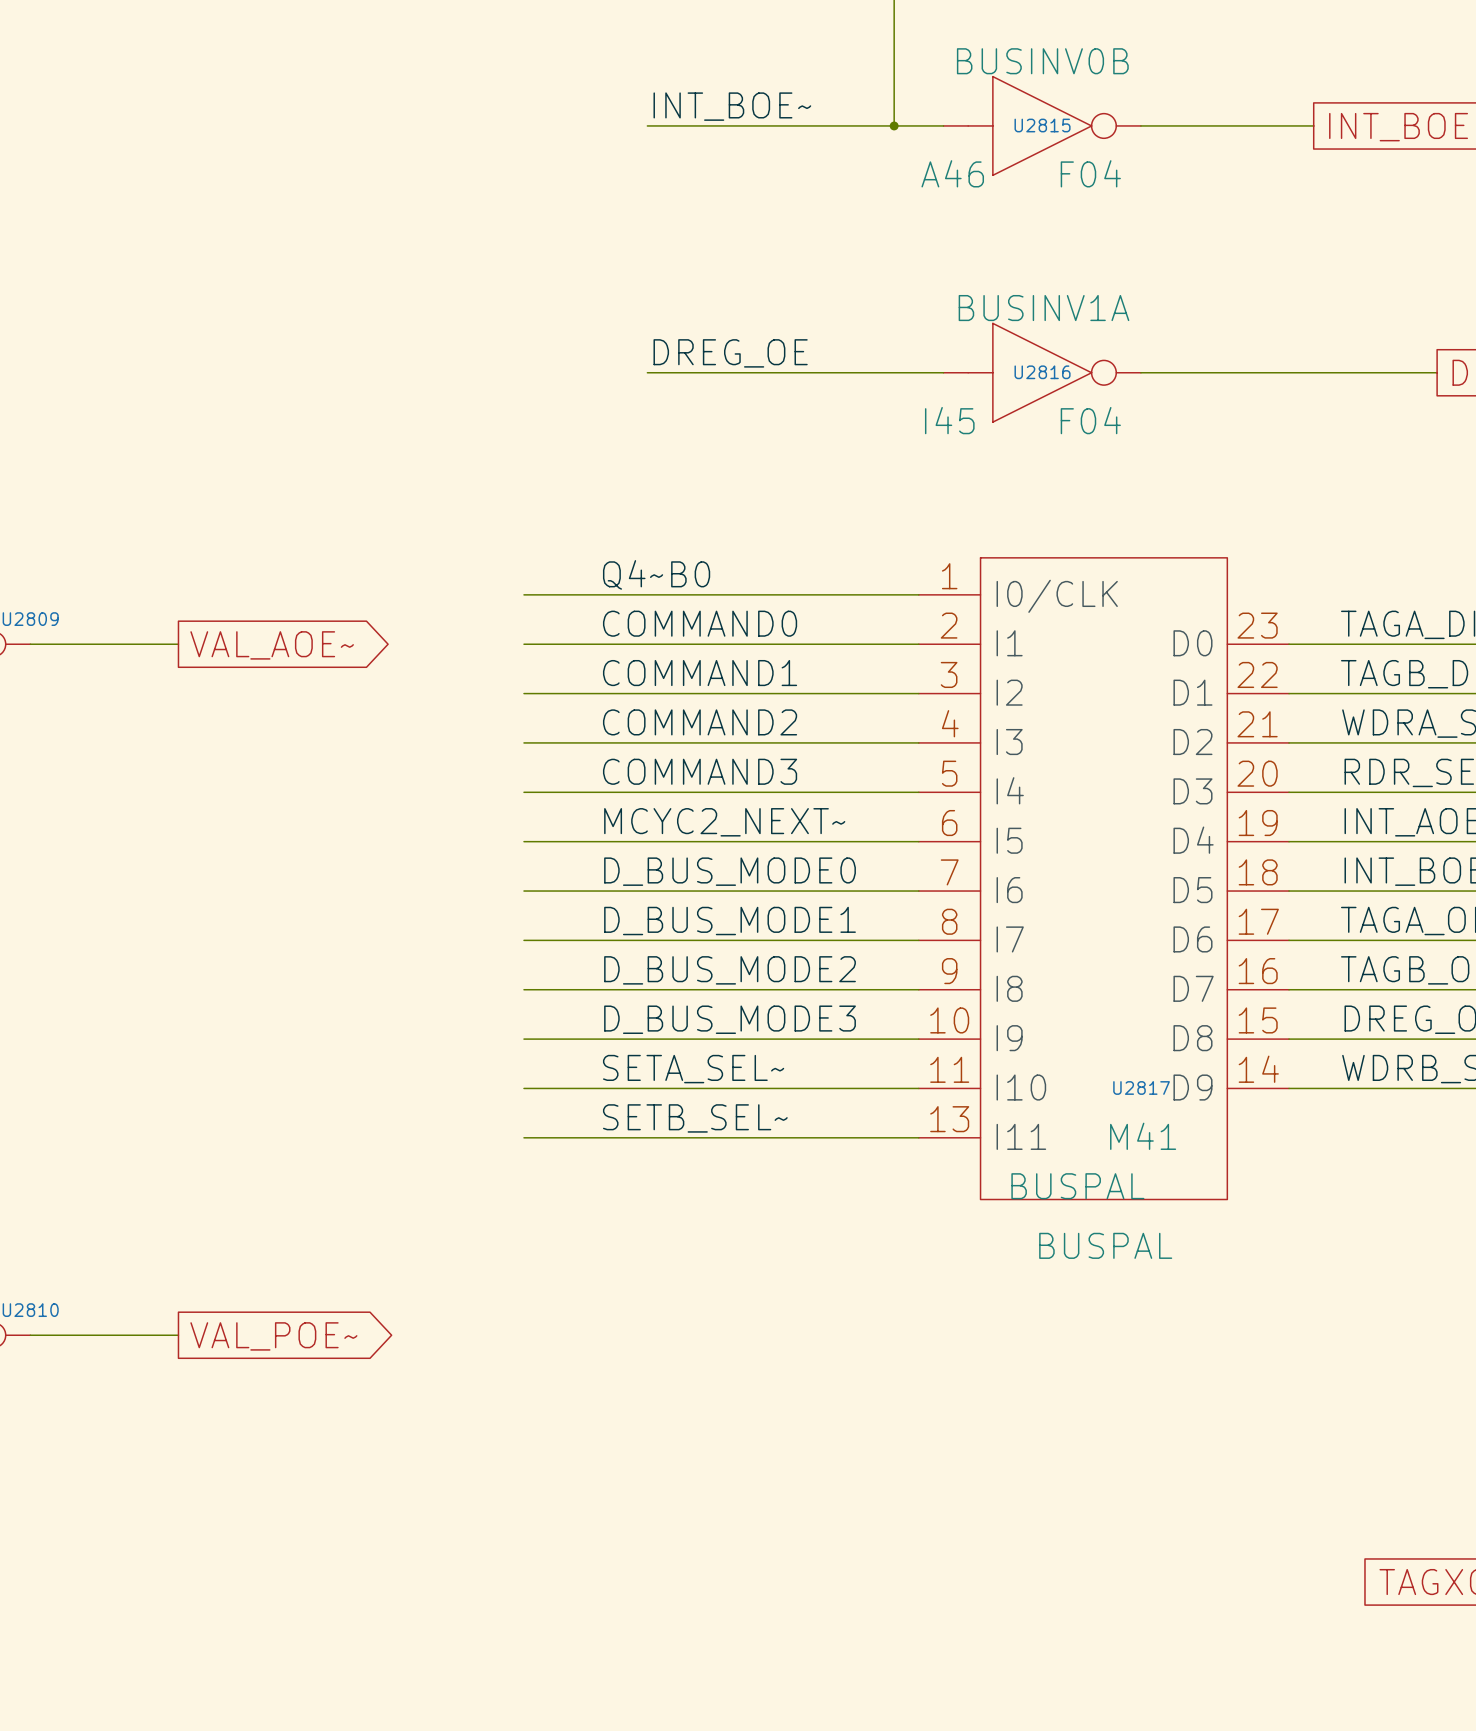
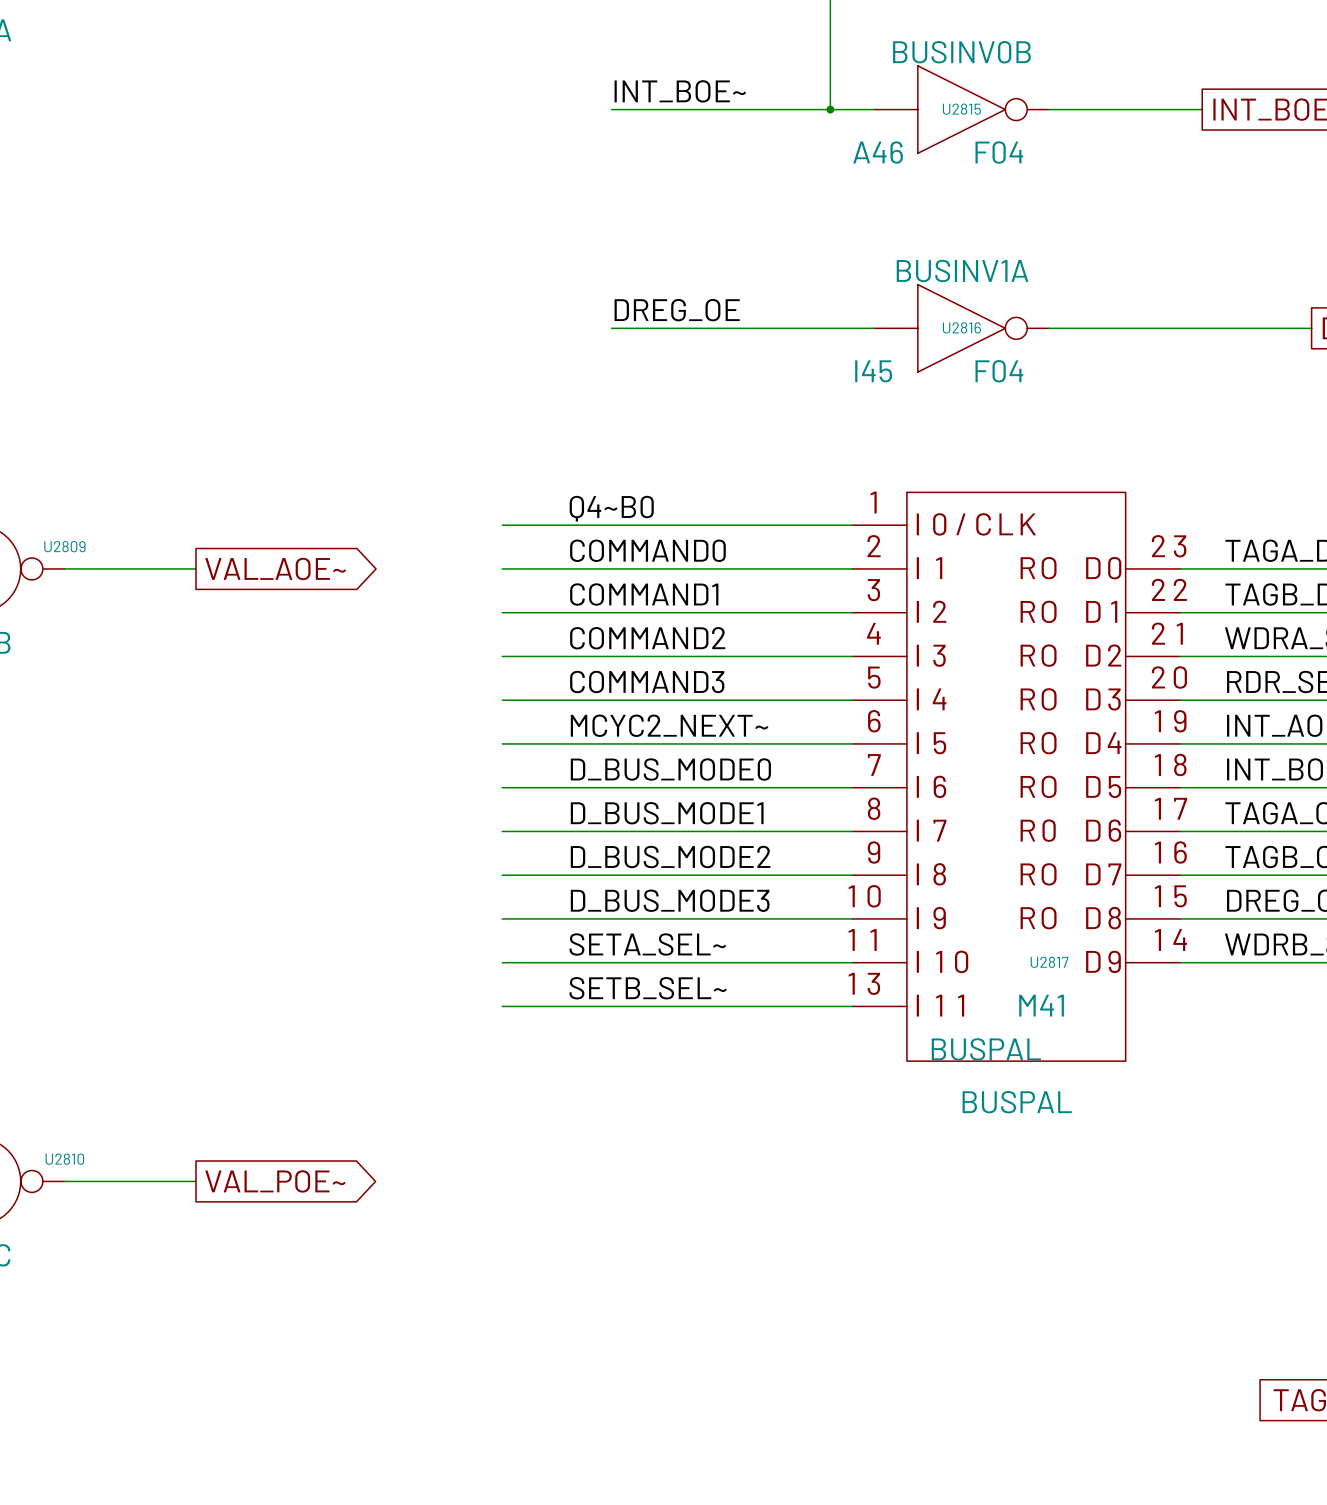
U2817 symbol: [918, 557, 1290, 1200] -> [852, 492, 1181, 1062]

